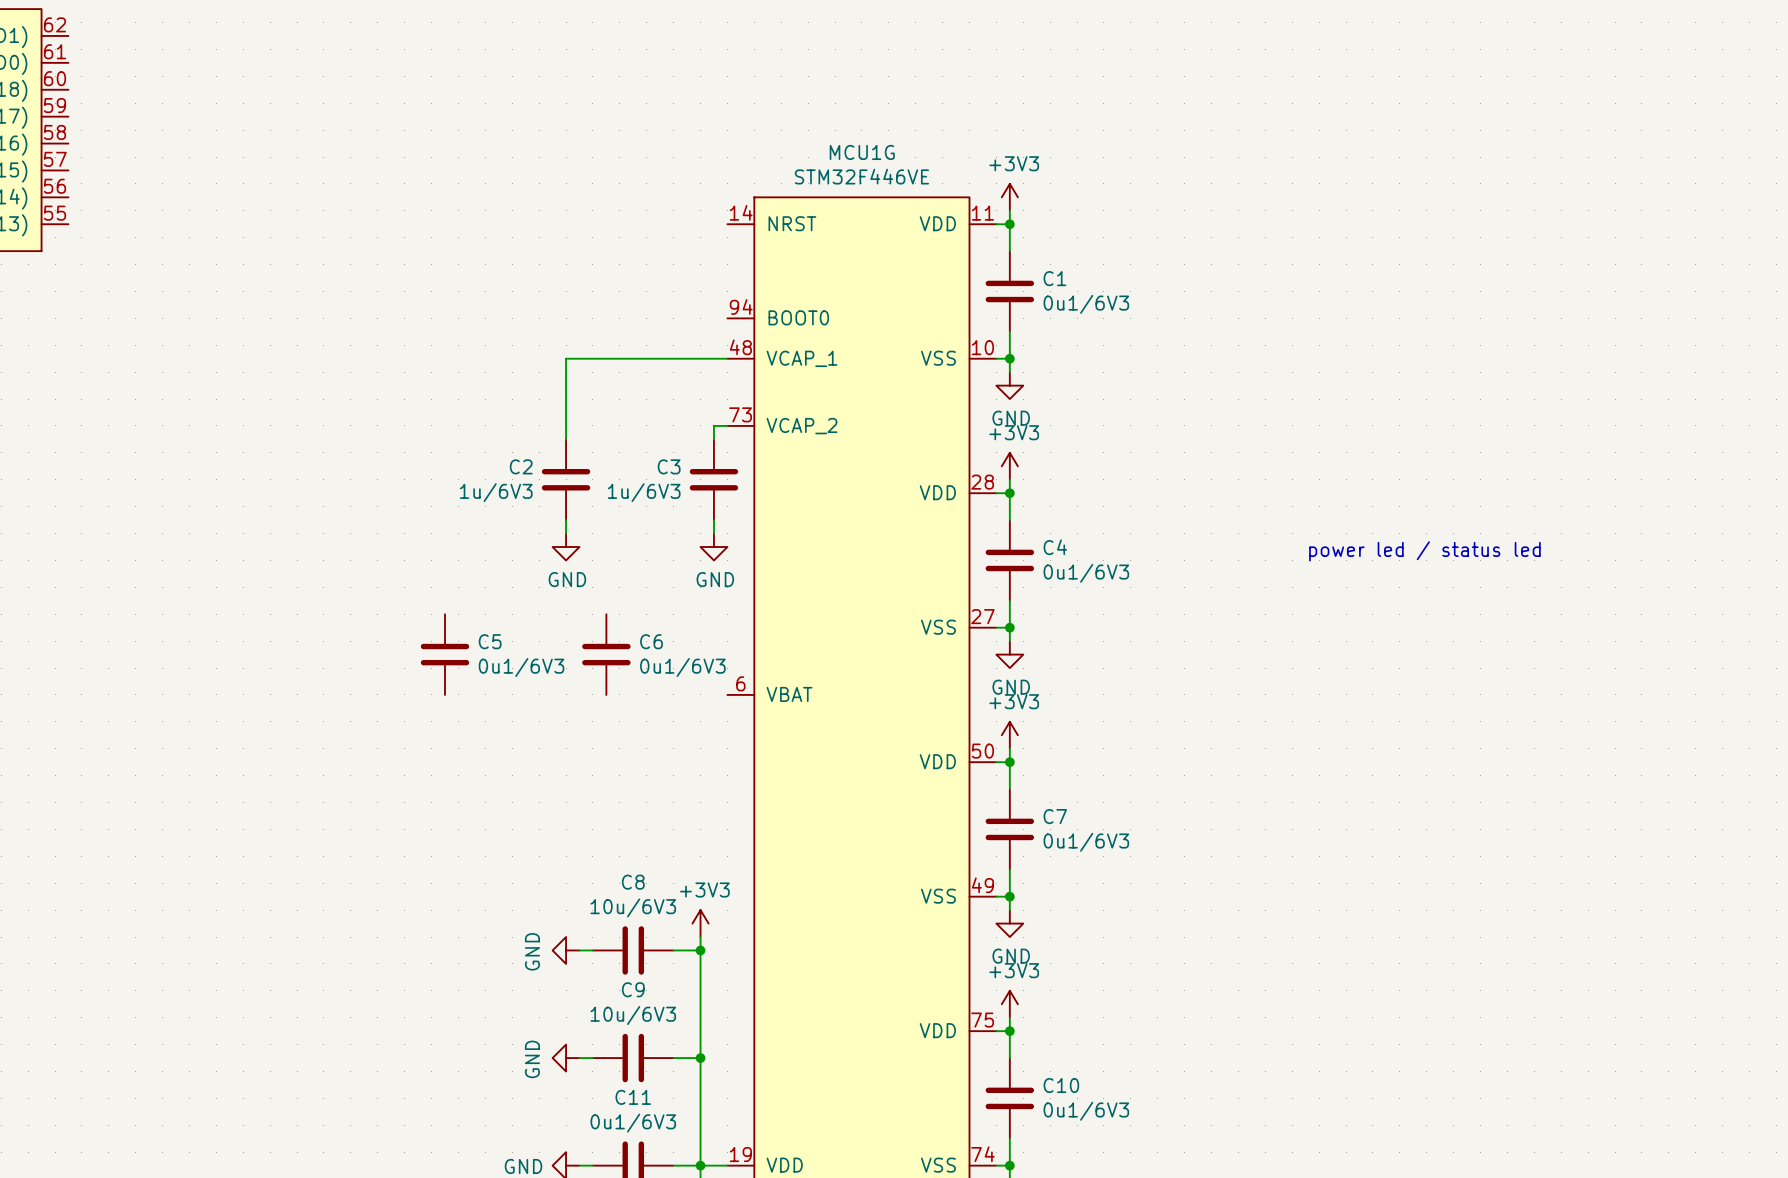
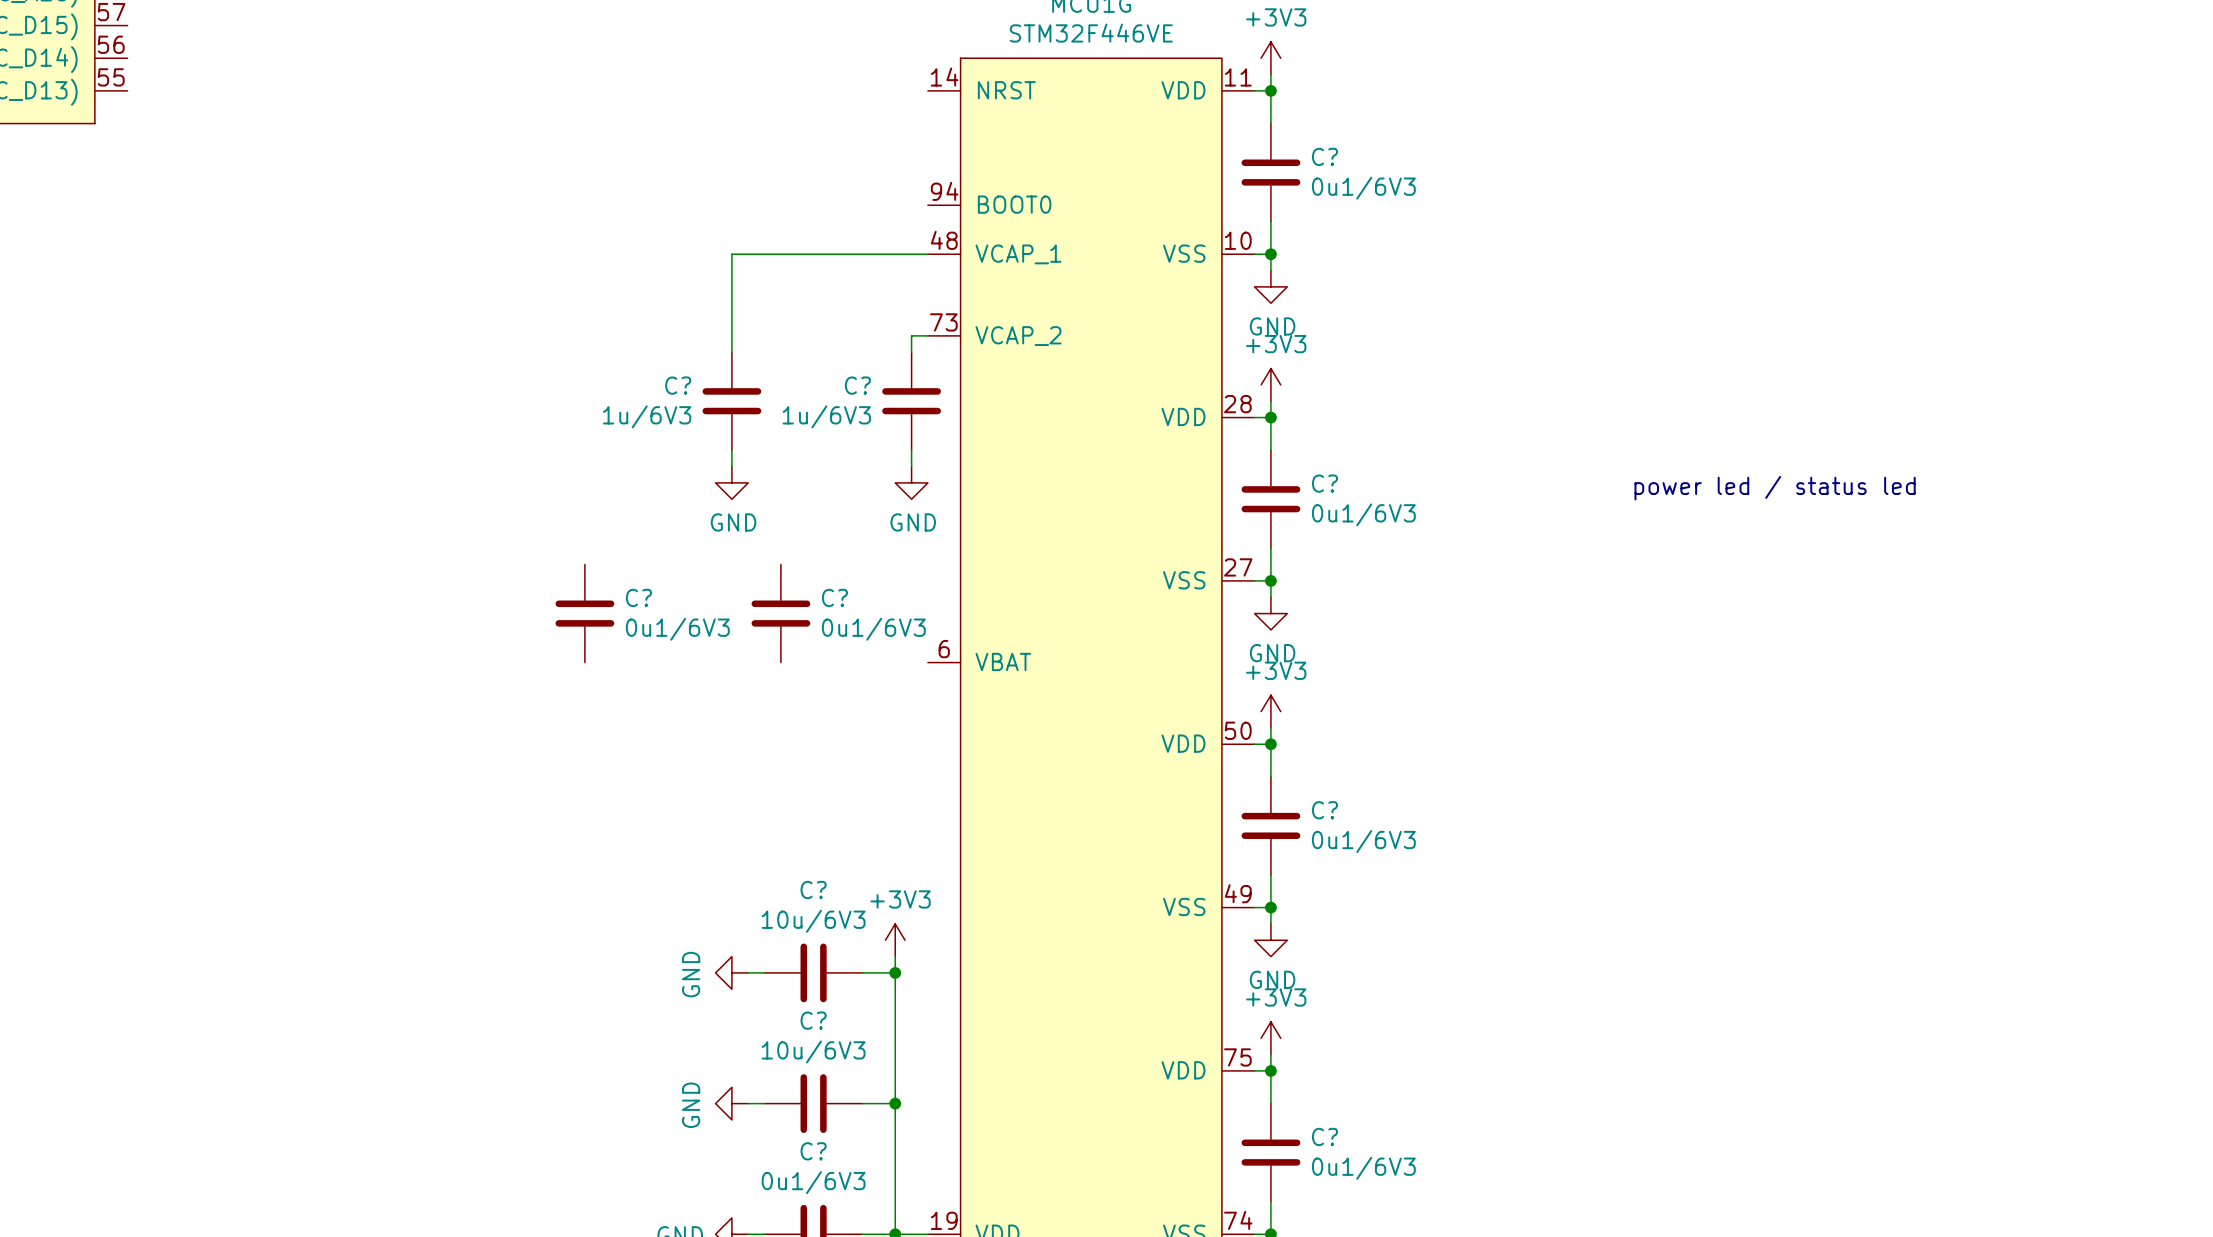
C1 name: C1 (1054, 278) -> C? (1324, 156)
C2 name: C2 (521, 466) -> C? (678, 385)
C3 name: C3 (669, 466) -> C? (857, 385)
C4 name: C4 (1055, 547) -> C? (1324, 483)
C5 name: C5 (490, 641) -> C? (638, 597)
C6 name: C6 (651, 641) -> C? (834, 597)
C7 name: C7 (1055, 816) -> C? (1324, 810)
C8 name: C8 (633, 882) -> C? (813, 889)
C9 name: C9 (633, 989) -> C? (813, 1020)
C10 name: C10 (1061, 1085) -> C? (1324, 1136)
C11 name: C11 (633, 1097) -> C? (813, 1151)

